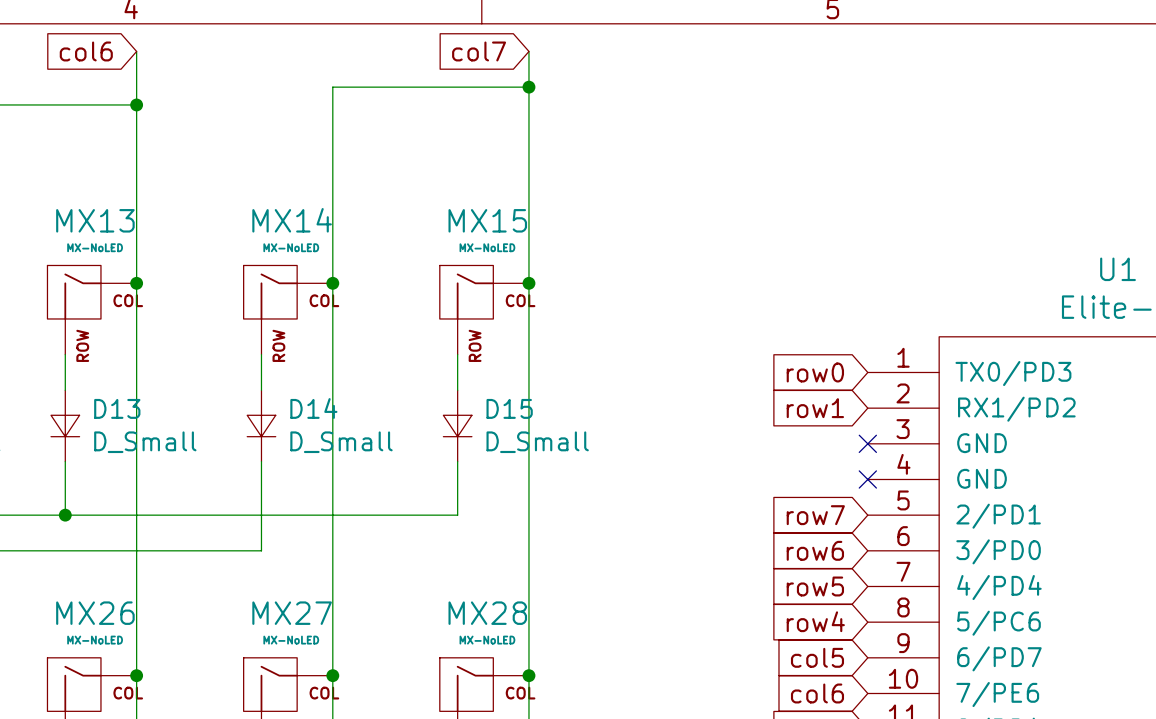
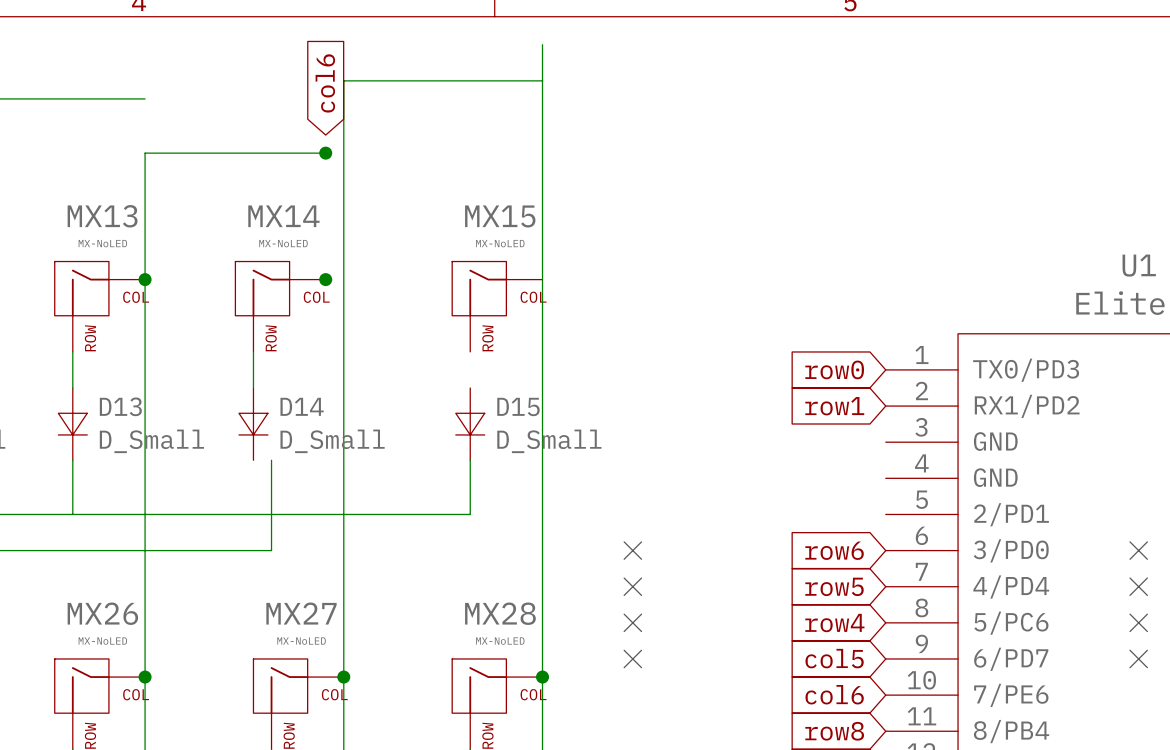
global label rotation: 0° (86, 51) -> 90° clockwise (325, 83)
global label position: col6 (86, 51) -> col6 (325, 83)
wire: (136, 51) (136, 158) -> (325, 153) (145, 153)
global label: col7 (479, 51) -> none
junction: (528, 87) -> none
junction: (136, 104) -> none
junction: none -> (325, 153)
junction position: (332, 283) -> (325, 279)
junction: (528, 283) -> none
MX14 position: (288, 310) -> (280, 306)
wire: (261, 354) (261, 390) -> (253, 351) (253, 387)
wire: (457, 354) (457, 390) -> none
D14 position: (261, 425) -> (253, 424)
no-connect mark: (867, 443) -> none
no-connect mark: (867, 479) -> none
junction: (65, 515) -> none
global label: row7 (815, 515) -> none
no-connect mark: none -> (632, 550)
no-connect mark: none -> (1138, 550)
no-connect mark: none -> (632, 586)
no-connect mark: none -> (1138, 586)
no-connect mark: none -> (632, 622)
no-connect mark: none -> (1138, 622)
no-connect mark: none -> (632, 658)
no-connect mark: none -> (1138, 658)

